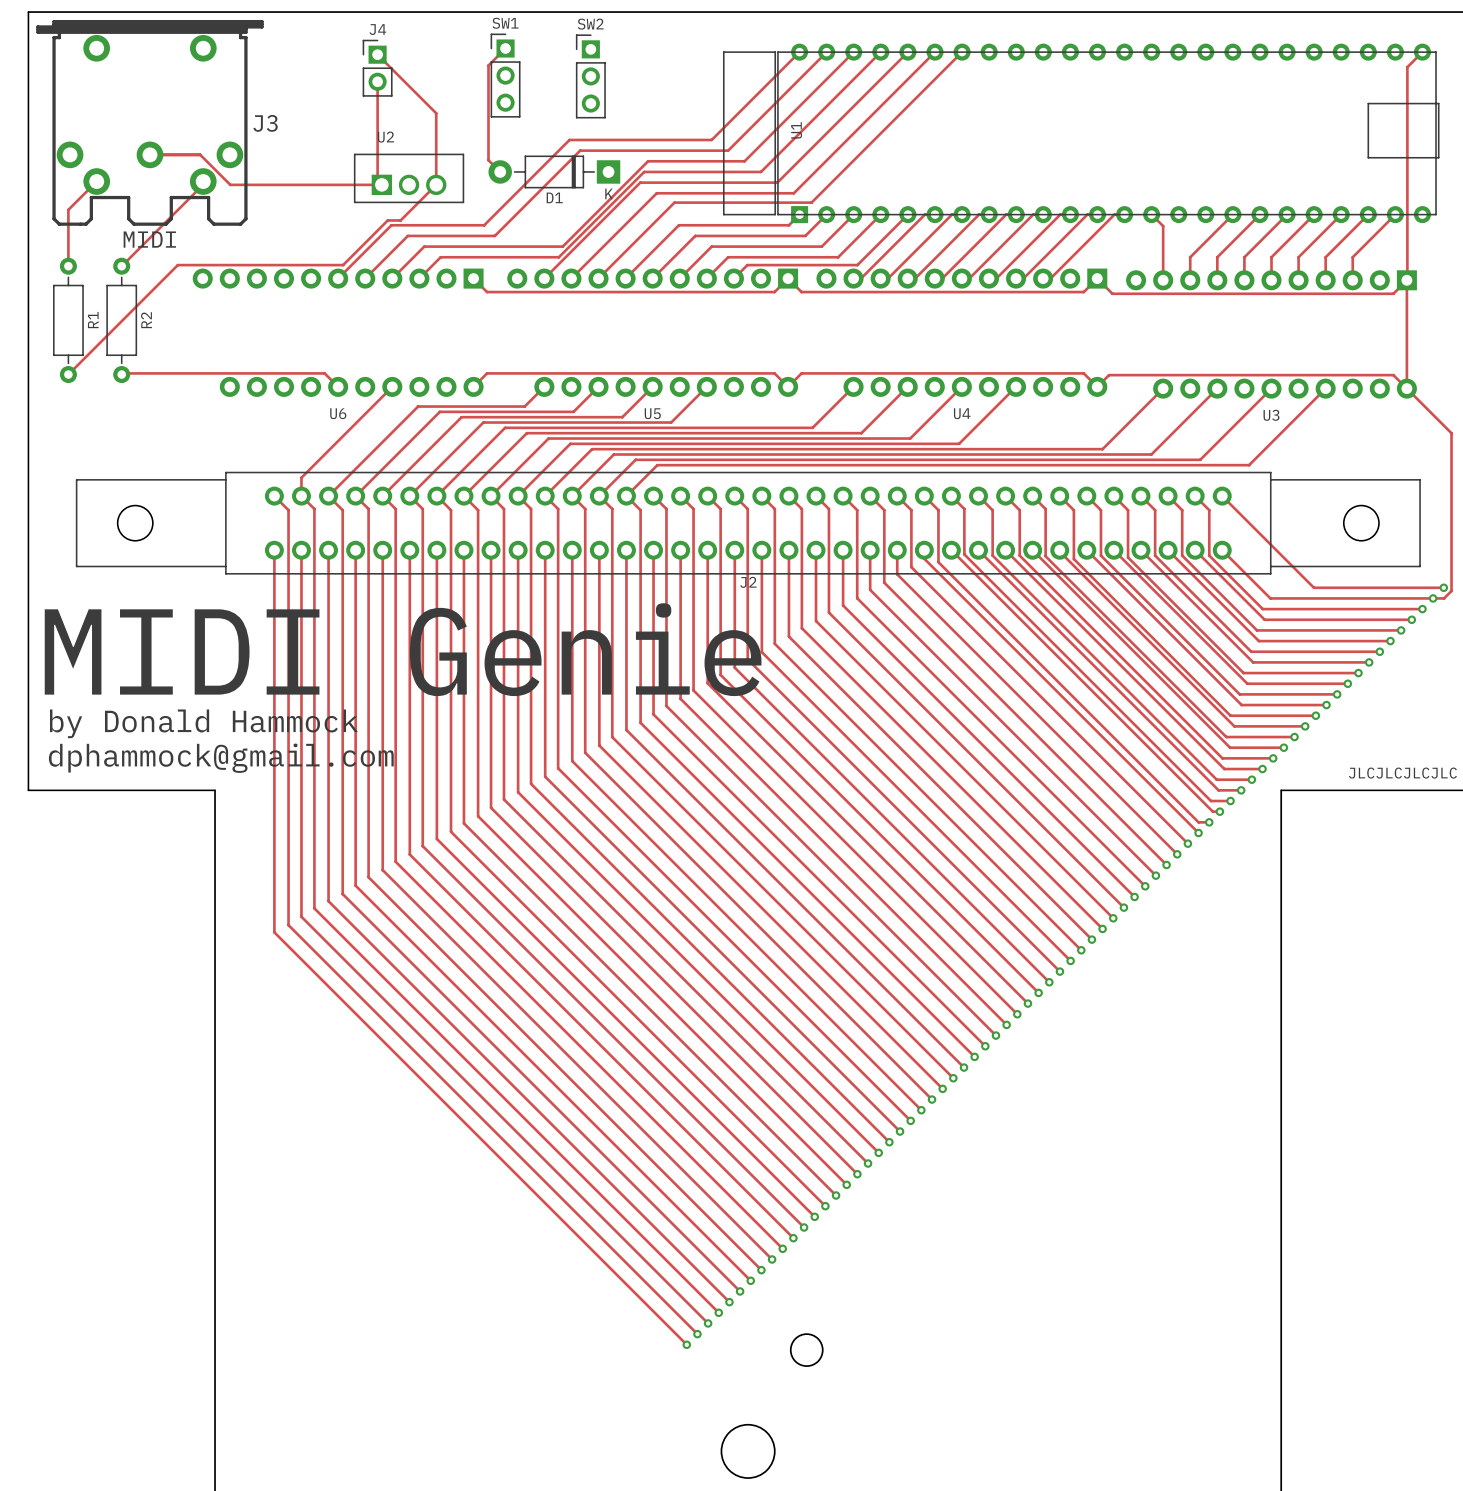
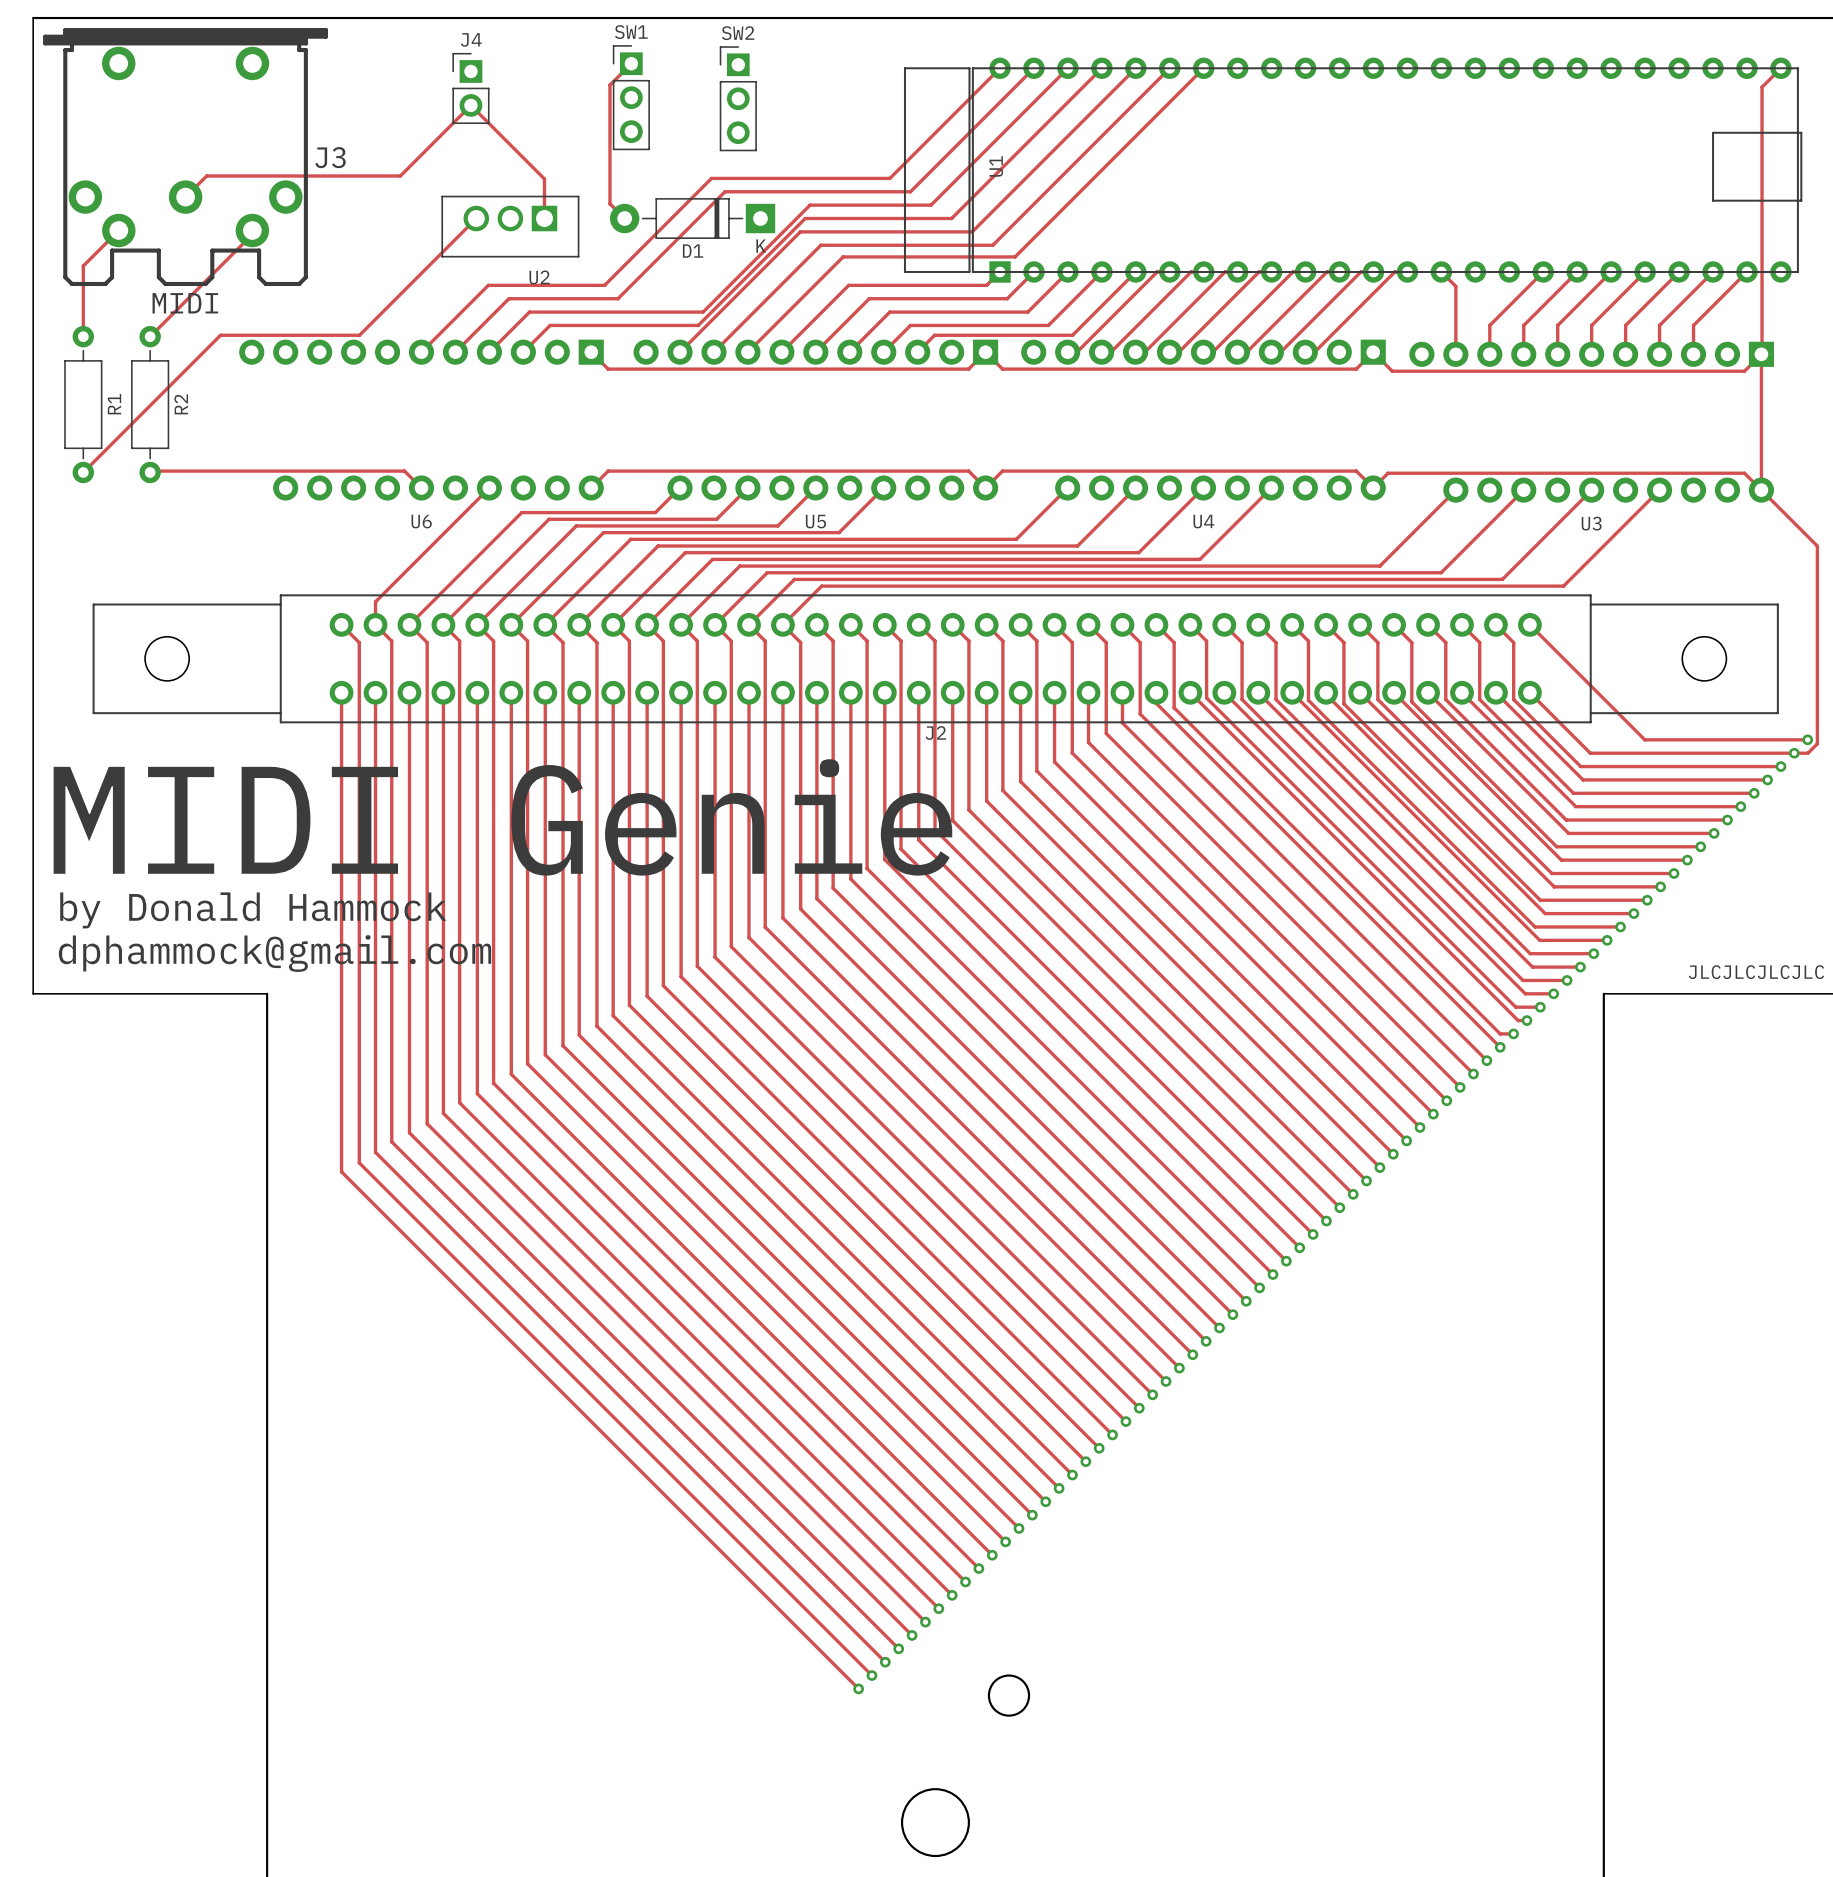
track: (377, 54) (436, 113) (436, 140) -> none
track: (377, 81) (377, 180) (381, 184) (230, 184) (200, 154) (149, 154) -> (544, 178) (470, 105) (400, 176) (206, 176) (185, 197)
track: (436, 171) (436, 184) (400, 220) (387, 220) (343, 265) (288, 265) -> (476, 218) (359, 335)
U2 rotation: 0° (409, 178) -> 180° (510, 226)

